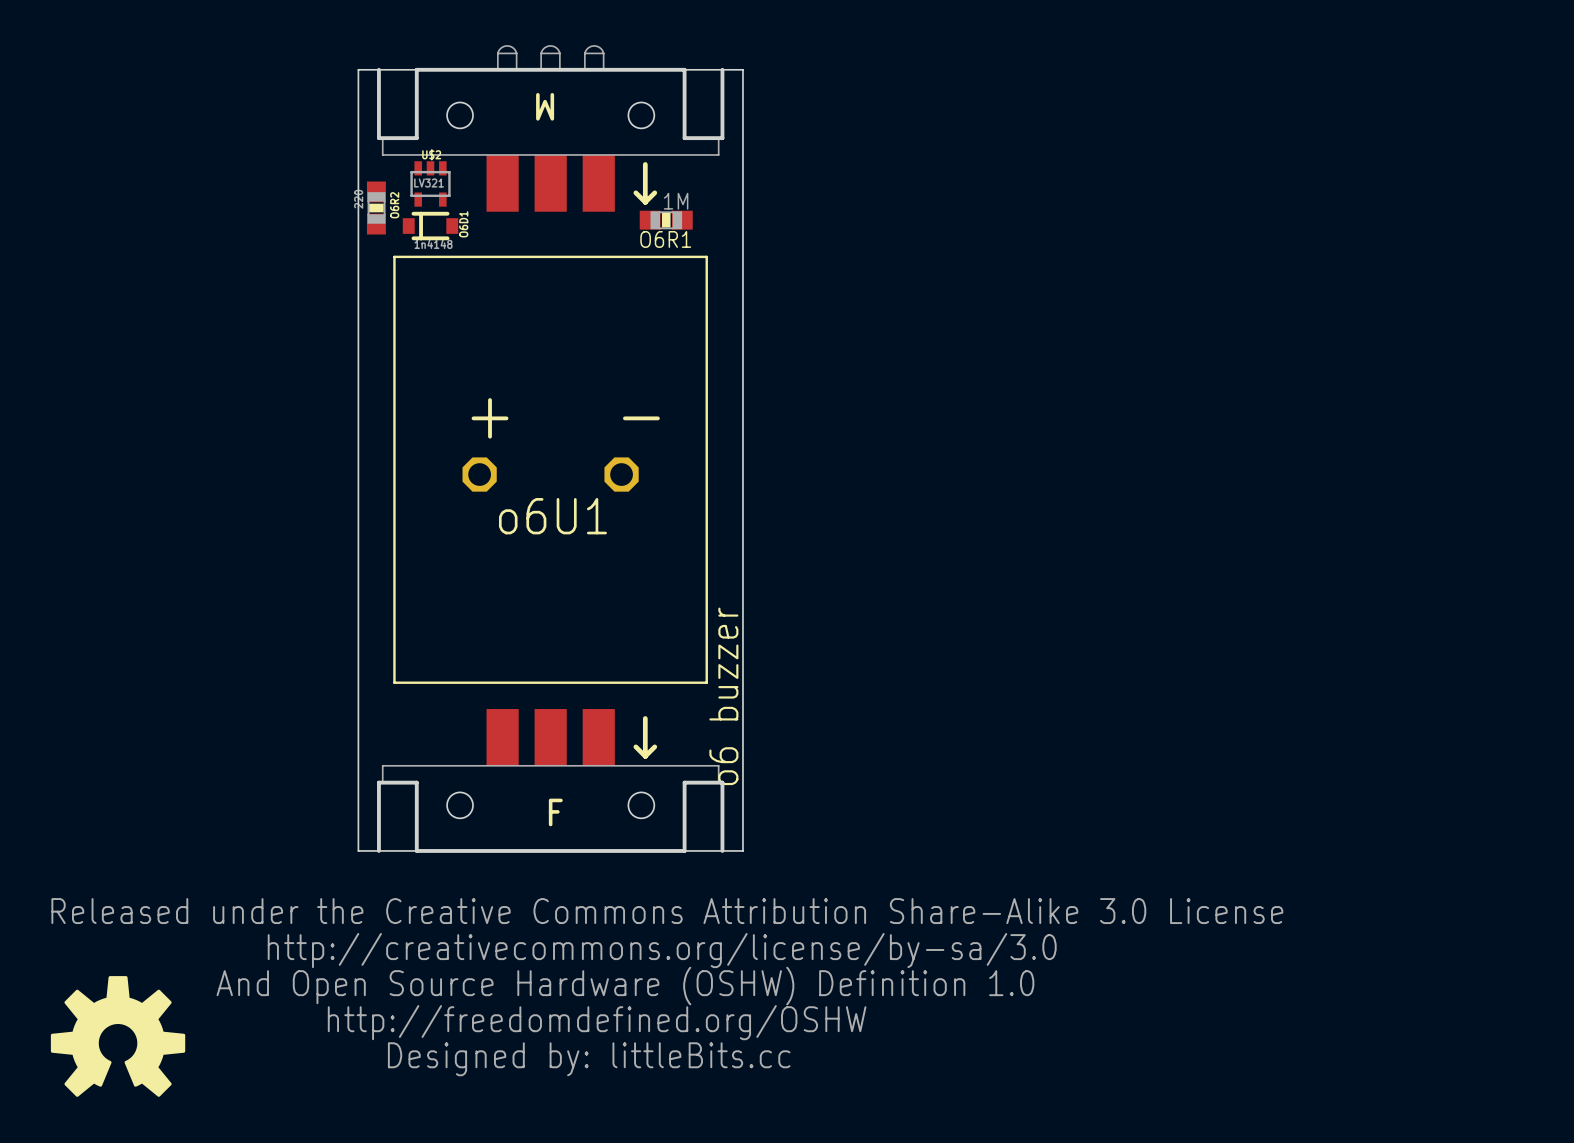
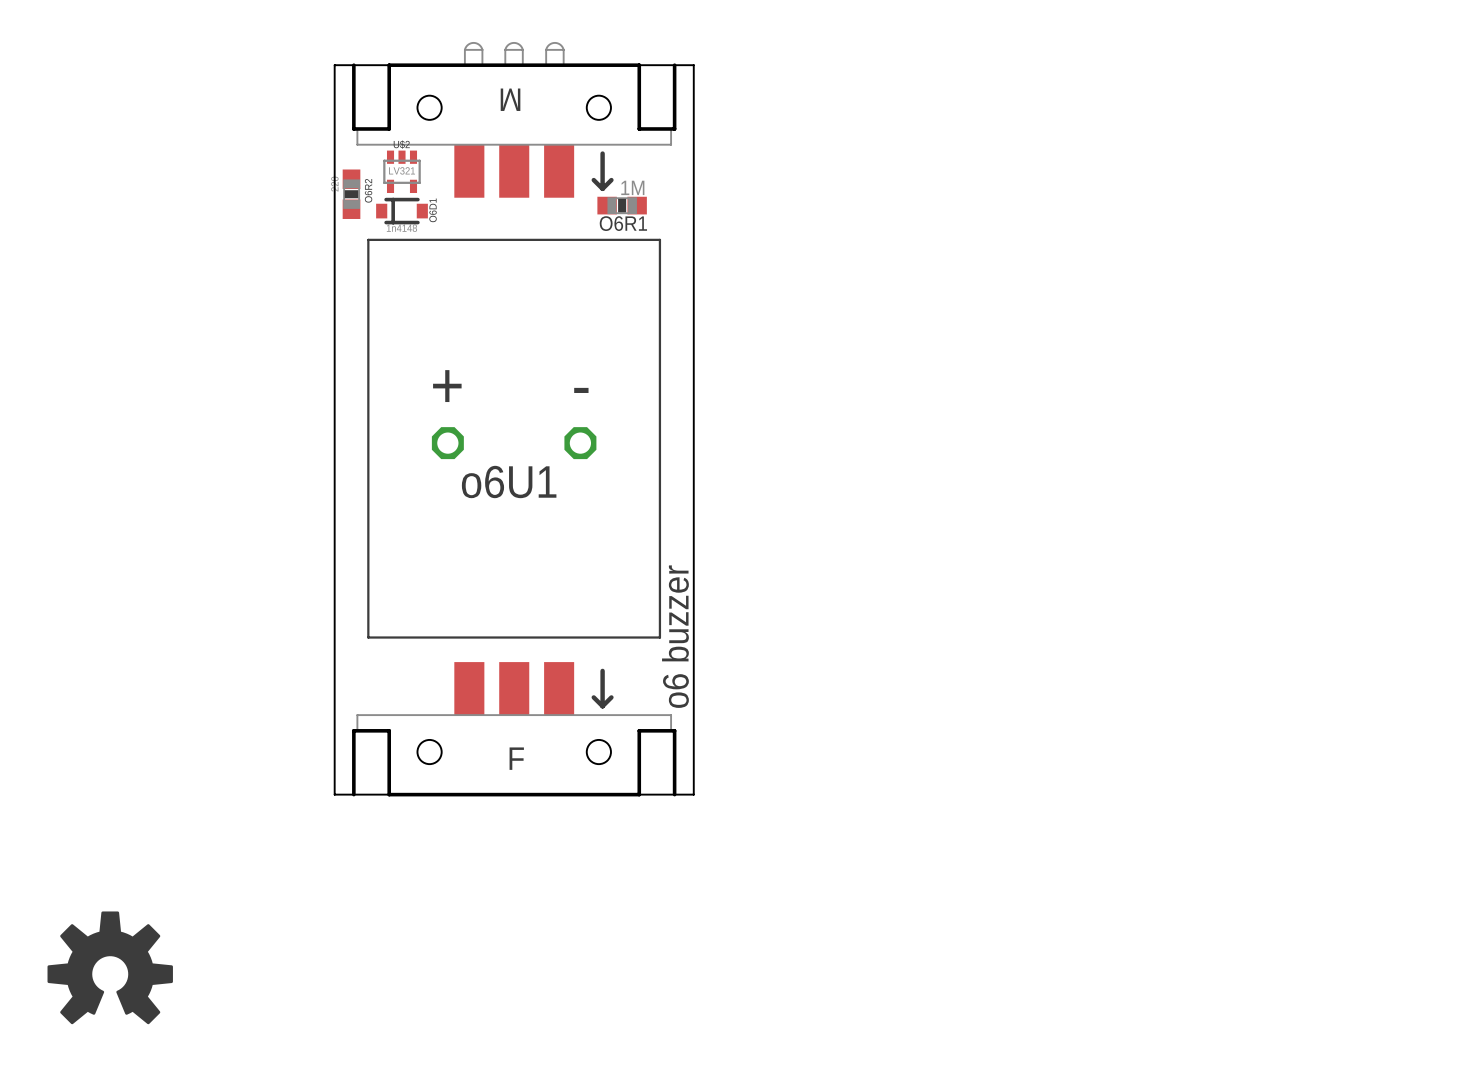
drawing: [51, 898, 1284, 1077] -> none

